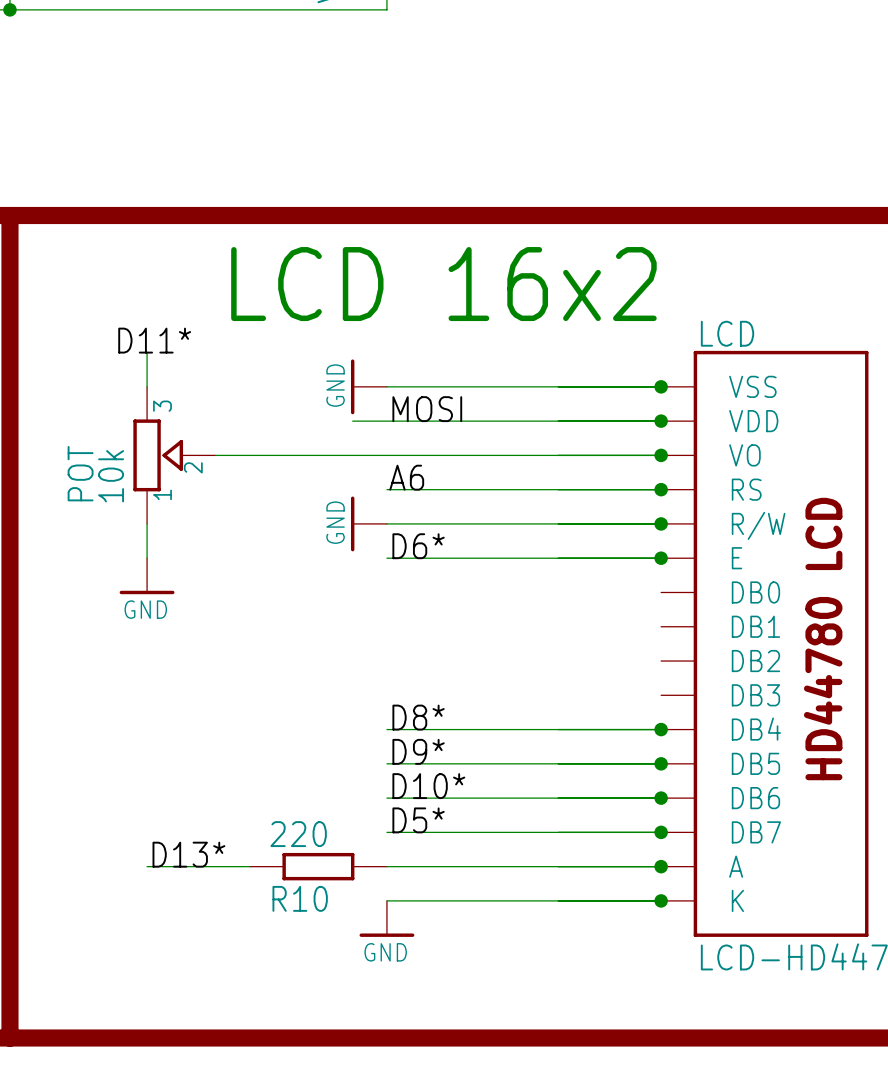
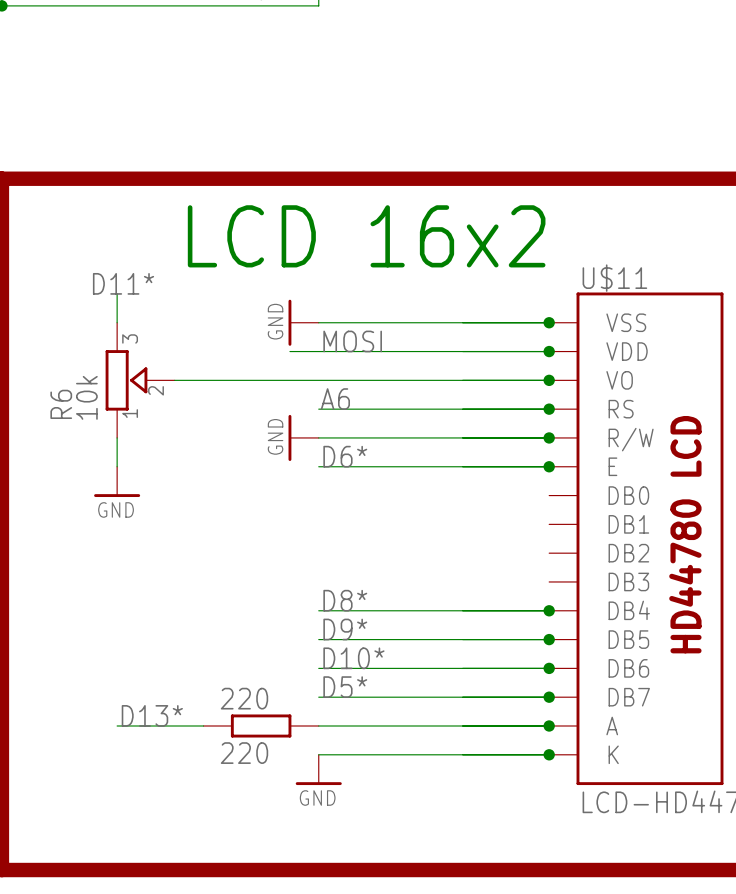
LCD name: LCD (727, 333) -> U$11 (614, 278)
POT name: POT (80, 473) -> R6 (61, 404)
R10 name: R10 (300, 898) -> 220 (244, 753)

